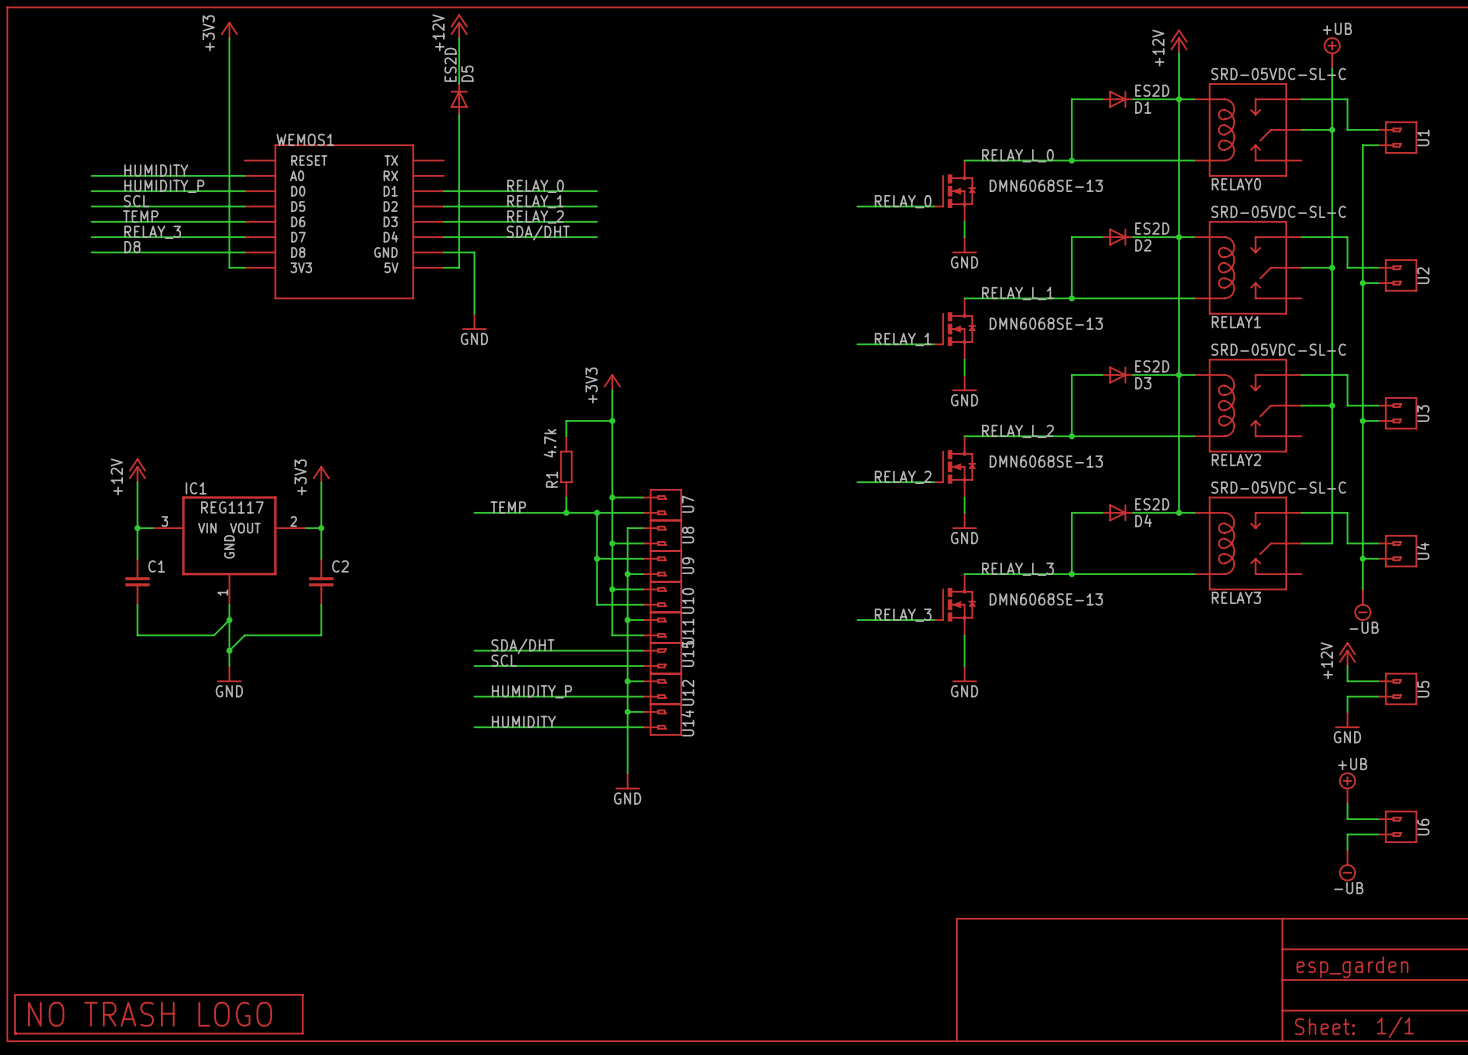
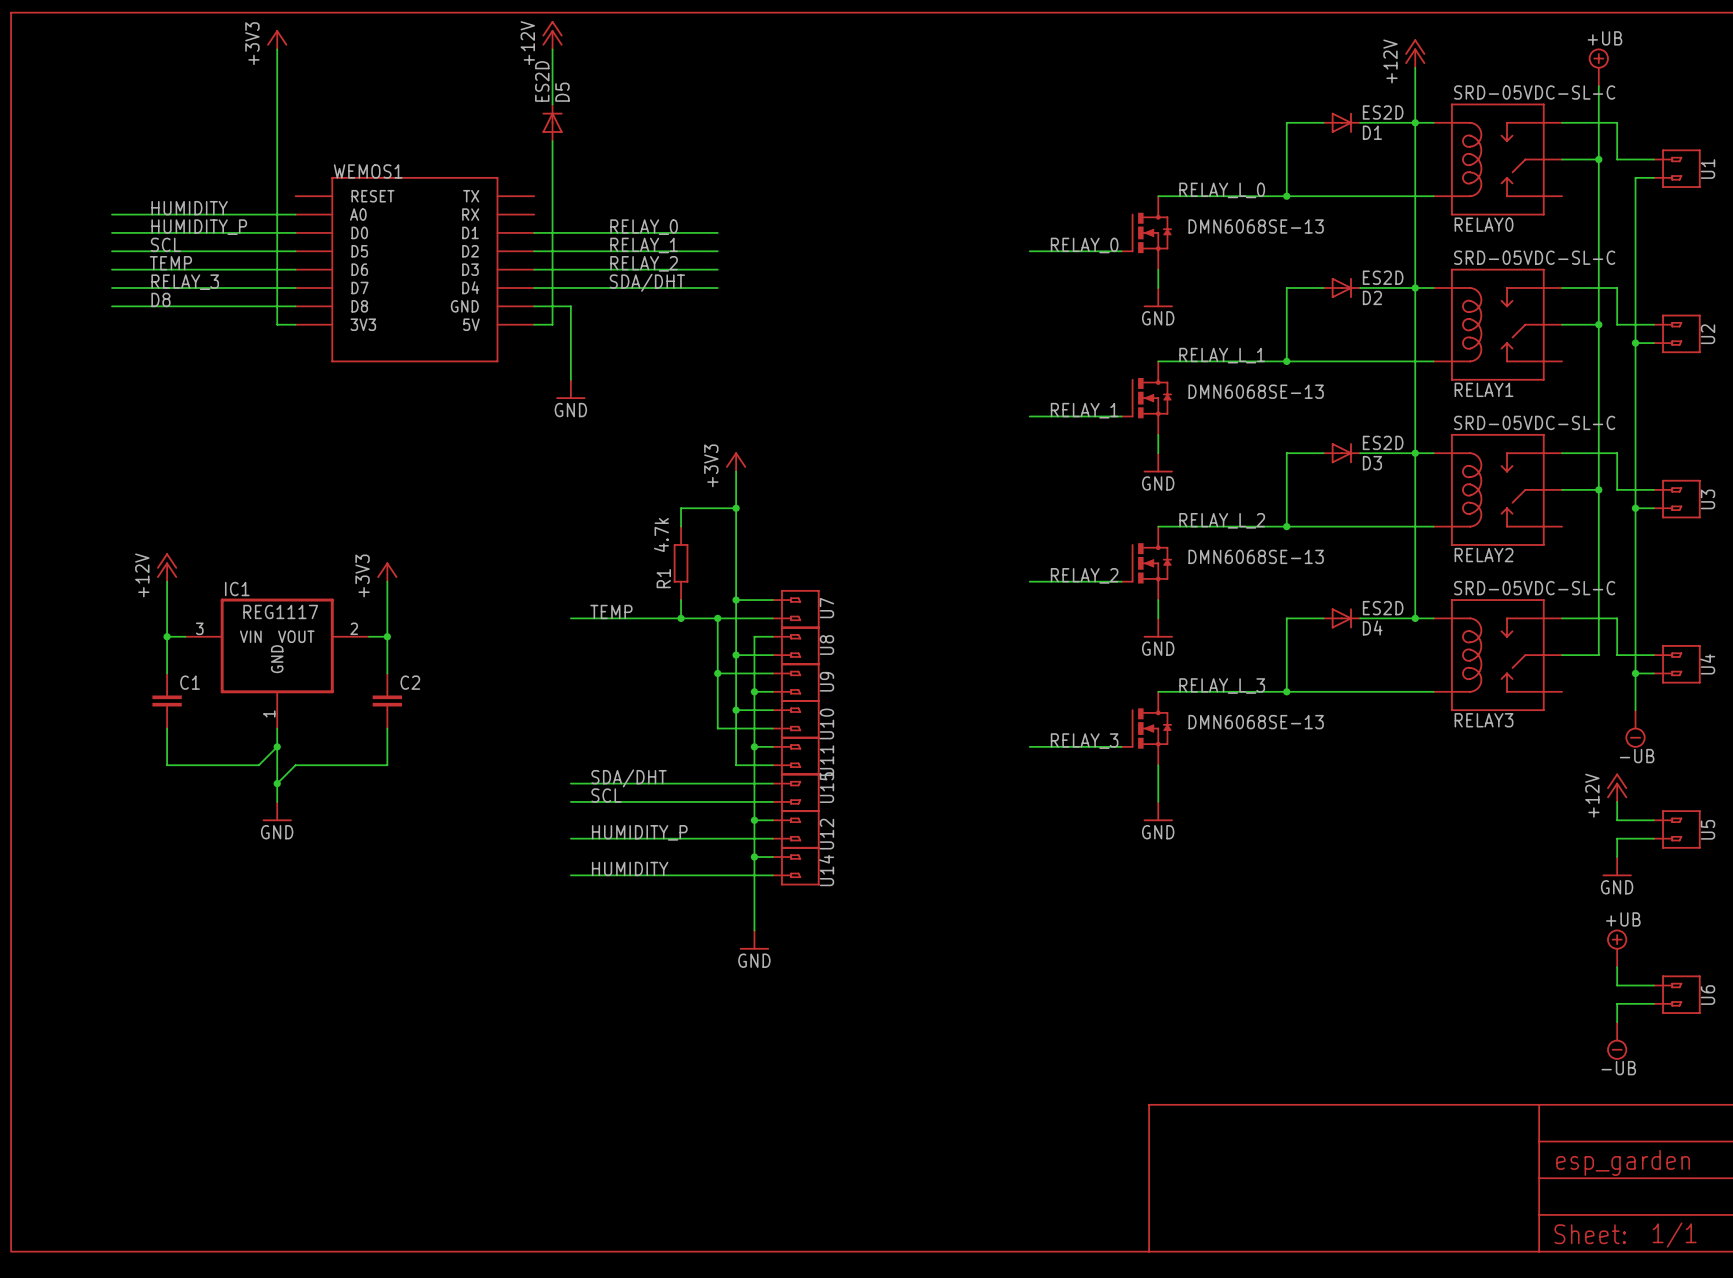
part: (158, 1014) -> none

